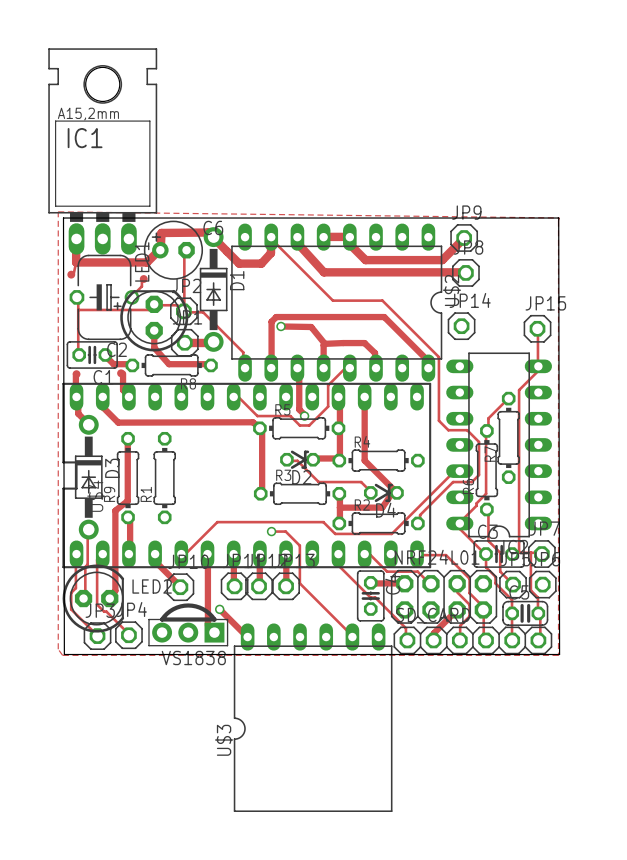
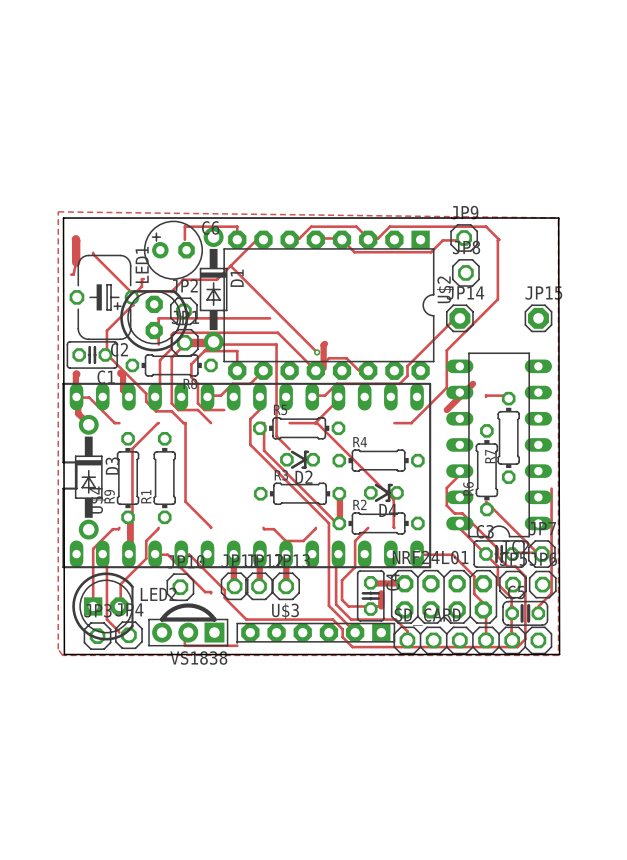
IC1: (102, 151) -> none
U$2 footprint: [231, 223, 443, 382] -> [223, 230, 435, 380]
track: (297, 237) (297, 243) (323, 272) (465, 272) -> none
track: (323, 237) (349, 237) (349, 244) (365, 260) (442, 260) (464, 238) -> none
track: none -> (368, 238) (378, 238) (389, 226) (486, 226) (499, 239) (497, 299) (446, 350) (446, 387) (411, 423) (394, 423)
track: none -> (368, 238) (356, 226) (311, 226) (299, 238) (289, 239)
track: none -> (184, 239) (184, 226) (237, 226) (237, 239)
track: none -> (263, 239) (256, 240) (216, 279) (183, 279) (171, 291)
track: none -> (315, 239) (340, 238) (354, 252) (431, 252) (442, 240) (459, 239)
track: (186, 250) (184, 251) (183, 311) -> none
track: none -> (93, 252) (130, 291) (171, 291)
track: (76, 262) (146, 262) (160, 250) (161, 232) (208, 232) (239, 263) (261, 263) (270, 253) (271, 237) (332, 300) (382, 300) (438, 357) (438, 420) (448, 430) (467, 430) (479, 441) (479, 474) (471, 482) (453, 482) (420, 515) (420, 522) (417, 523) -> none
track: none -> (230, 265) (317, 352)
part: (71, 274) -> none
part: (143, 279) -> none
track: (76, 297) (79, 354) -> none
track: none -> (133, 305) (106, 330) (106, 357) (110, 358) (146, 393) (146, 401) (156, 411) (171, 411) (185, 423) (185, 501) (211, 527)
track: (78, 309) (148, 309) (154, 304) (177, 305) (183, 311) -> none
track: (183, 311) (203, 312) (243, 352) (243, 366) (245, 368) -> none
JP14 footprint: [447, 312, 476, 341] -> [446, 304, 474, 333]
JP15 footprint: [523, 314, 552, 343] -> [524, 304, 553, 333]
track: none -> (270, 318) (158, 318) (158, 344)
track: none -> (459, 318) (454, 319) (407, 366) (407, 375) (399, 383) (336, 383) (325, 395) (315, 396)
track: (281, 326) (311, 327) (324, 343) (364, 343) (375, 353) (376, 368) -> none
via: (281, 326) -> none
track: (537, 328) (537, 371) (519, 390) (519, 552) -> none
track: (154, 330) (154, 347) (168, 364) (211, 365) -> none
track: none -> (184, 344) (171, 357) (171, 403) (178, 410) (197, 410) (211, 423)
track: none -> (204, 351) (237, 351) (237, 370)
via: none -> (317, 352)
track: (105, 354) (113, 364) (132, 365) -> none
track: (271, 368) (271, 321) (276, 317) (384, 317) (425, 358) (428, 368) -> none
track: (297, 368) (299, 370) (299, 409) (304, 416) -> none
track: (349, 368) (344, 368) (328, 385) (328, 406) (309, 425) (299, 425) (290, 416) (257, 416) (238, 397) (233, 396) -> none
track: none -> (263, 370) (250, 383) (232, 383) (220, 395) (211, 396)
track: none -> (368, 370) (358, 370) (346, 358) (328, 358) (315, 370) (277, 332) (173, 332) (171, 334) (171, 348) (159, 360) (158, 396)
track: none -> (472, 383) (446, 410)
track: none -> (80, 396) (89, 397) (114, 423) (119, 423)
track: (102, 396) (103, 407) (118, 422) (252, 422) (262, 430) (260, 493) -> none
track: none -> (263, 396) (262, 407) (250, 419) (250, 444) (328, 523) (328, 605) (355, 632)
track: (338, 396) (339, 460) (337, 458) (313, 459) -> none
track: none -> (342, 396) (315, 423)
track: (364, 396) (364, 460) (396, 492) (391, 493) (382, 507) (339, 507) -> none
track: none -> (486, 396) (512, 396)
track: (508, 398) (488, 418) (488, 430) (486, 432) (486, 493) (459, 523) (460, 529) (486, 554) (486, 567) (495, 576) (495, 583) (512, 599) (512, 640) -> none
track: none -> (224, 410) (204, 410) (197, 403) (197, 383) (191, 377) (191, 364) (211, 344) (276, 344) (276, 436) (289, 449)
via: (304, 416) -> none
track: none -> (158, 423) (132, 448) (132, 554)
track: none -> (263, 423) (264, 450) (342, 527)
track: none -> (289, 423) (317, 423) (393, 499) (394, 527)
track: (128, 438) (127, 500) (115, 510) (115, 590) (109, 598) -> none
track: (286, 459) (297, 460) (318, 482) (361, 482) (370, 492) -> none
track: (459, 471) (453, 472) (391, 533) (335, 533) (323, 522) (217, 522) (186, 552) (181, 554) -> none
track: none -> (459, 475) (446, 487) (446, 505) (454, 513) (462, 513) (497, 548) (497, 556) (507, 566) (515, 566) (525, 576) (525, 639) (517, 647) (352, 647) (342, 637) (342, 629) (332, 619) (246, 619) (224, 597) (224, 590) (189, 554) (184, 554)
track: none -> (551, 488) (551, 593) (538, 606)
track: none -> (486, 501) (538, 554)
track: (486, 509) (488, 510) (488, 541) (500, 552) (500, 571) (513, 584) -> none
track: none -> (119, 527) (112, 529) (93, 548) (93, 606)
track: none -> (158, 527) (146, 541) (146, 558) (120, 584) (119, 606)
track: none -> (263, 527) (273, 529) (285, 541) (303, 541) (315, 527)
track: none -> (368, 527) (355, 541) (355, 567) (342, 580) (342, 599) (348, 606) (381, 606) (381, 593)
track: none -> (459, 527) (497, 566) (497, 584) (511, 597) (512, 632)
track: (88, 529) (87, 564) (85, 566) (85, 597) (83, 598) -> none
track: (271, 531) (285, 531) (299, 545) (299, 583) (352, 637) -> none
via: (271, 531) -> none
track: (530, 552) (530, 590) (537, 597) (537, 611) (540, 614) (540, 640) (538, 640) -> none
track: (76, 554) (75, 588) (71, 592) (71, 609) (97, 636) -> none
track: (102, 554) (97, 559) (97, 604) (128, 635) -> none
track: none -> (106, 554) (106, 619) (119, 632)
track: (155, 554) (156, 562) (180, 587) -> none
track: none -> (158, 554) (167, 554) (205, 592) (211, 593)
track: (207, 554) (207, 625) (214, 632) -> none
track: (338, 554) (339, 566) (370, 597) (375, 597) (405, 628) (407, 640) -> none
track: none -> (342, 554) (336, 561) (336, 604) (351, 619) (395, 619) (407, 632)
track: (364, 554) (370, 555) (387, 571) (417, 571) (430, 583) -> none
track: (417, 554) (446, 555) (469, 578) (469, 593) (481, 605) (483, 609) (483, 640) (486, 640) -> none
track: none -> (420, 554) (452, 554) (474, 576) (474, 594) (486, 605) (486, 632)
LED2 footprint: [62, 564, 125, 633] -> [72, 572, 134, 641]
track: (457, 583) (457, 592) (469, 604) (469, 616) (460, 625) (459, 640) -> none
track: (219, 609) (247, 637) -> none
via: (219, 609) -> none
track: (457, 609) (434, 632) (433, 640) -> none
U$3 footprint: [233, 623, 393, 813] -> [236, 622, 396, 644]
track: none -> (184, 632) (184, 645) (237, 645)
U$3 name position: U$3 (224, 740) -> U$3 (285, 611)

